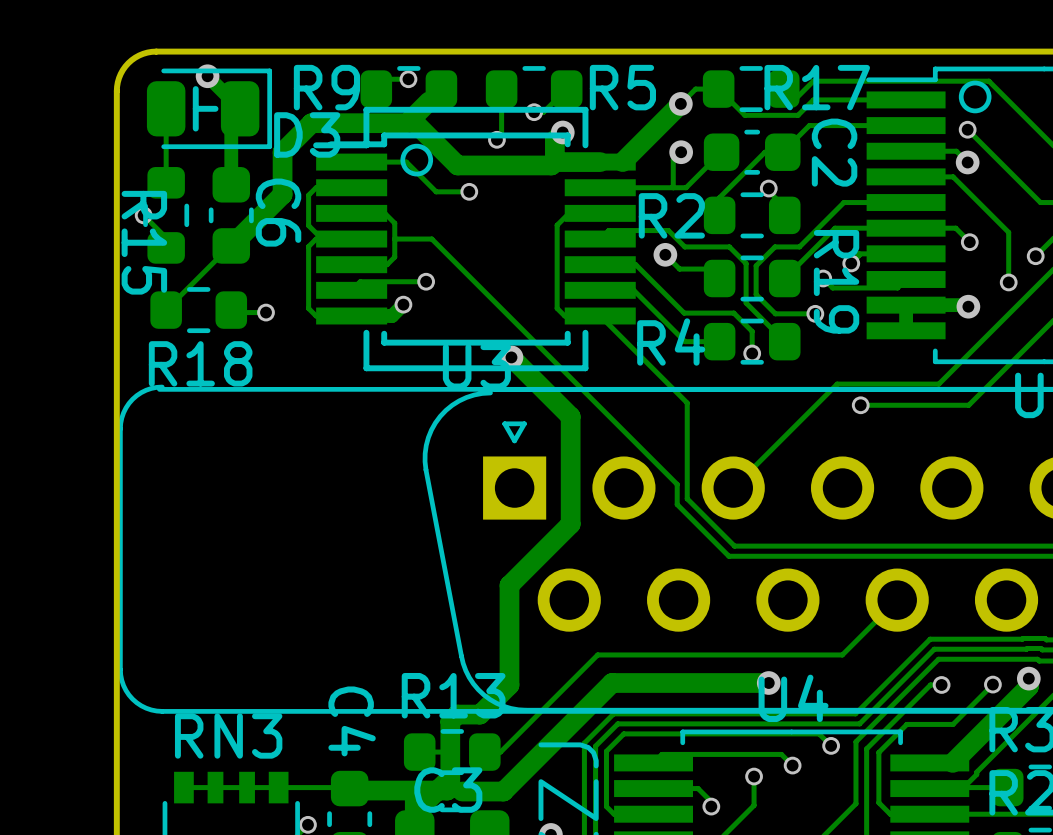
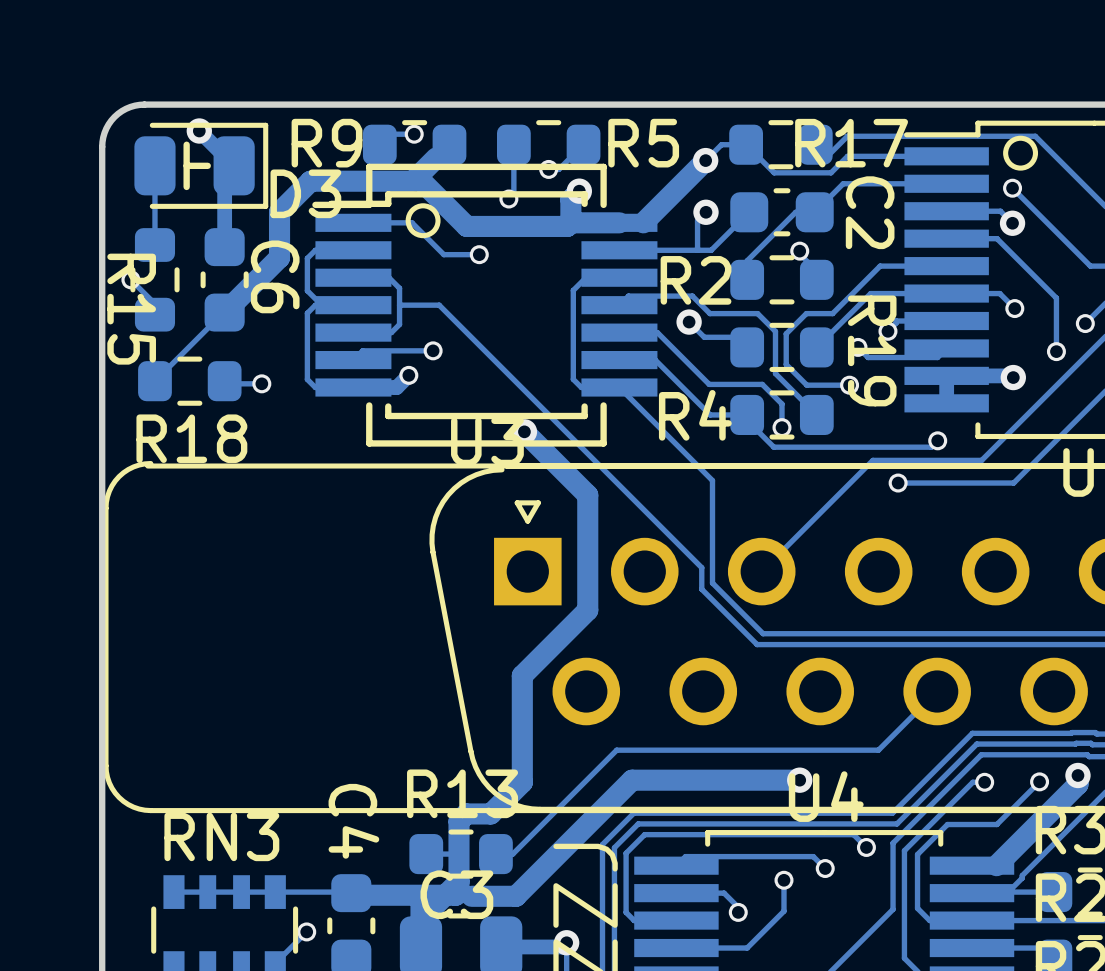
track: none -> (747, 420) (773, 447) (931, 447) (937, 440)
via: none -> (937, 440)

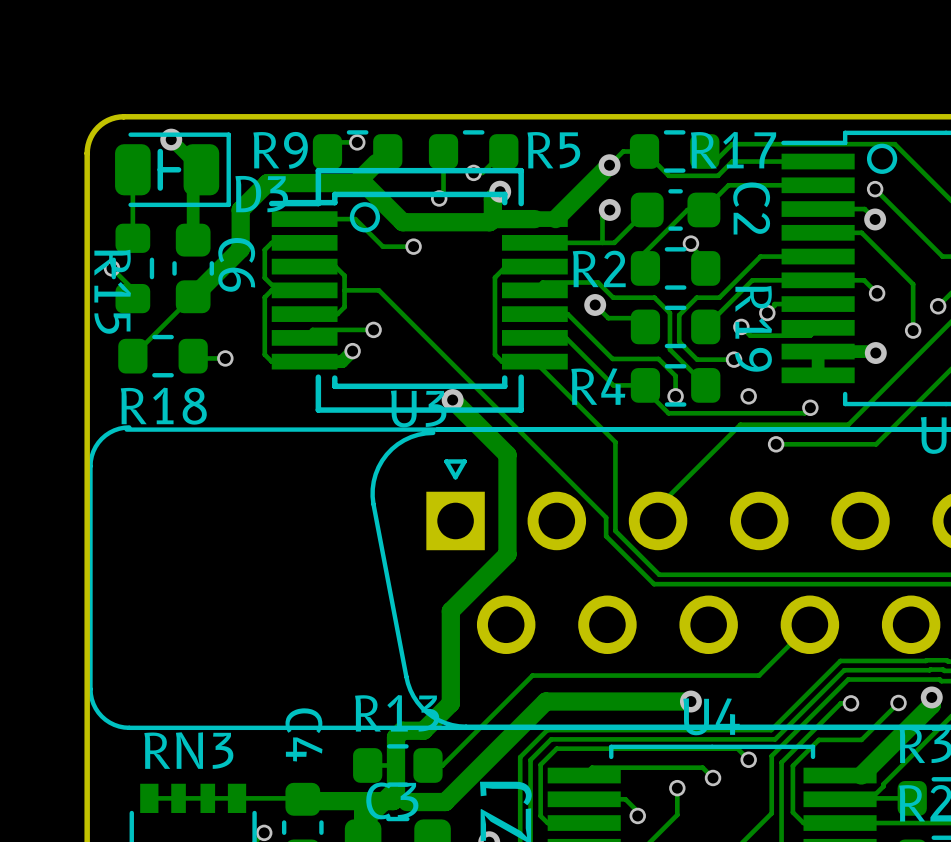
via: none -> (748, 396)
track: (872, 460) (761, 571) -> (754, 424) (740, 424) (658, 507)

